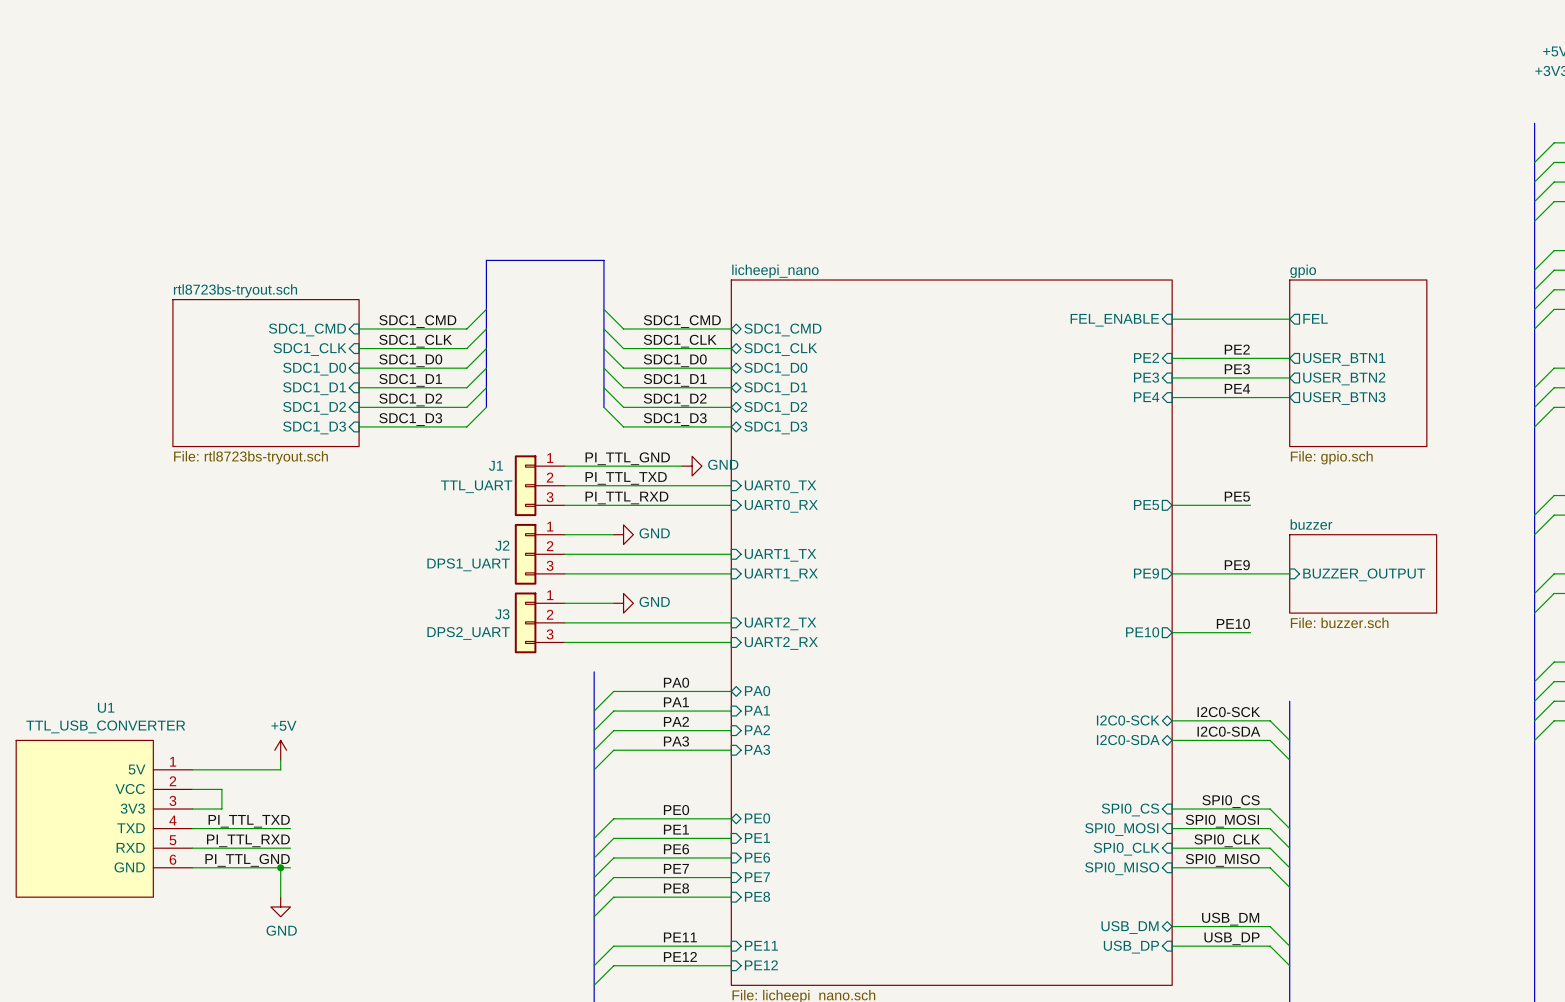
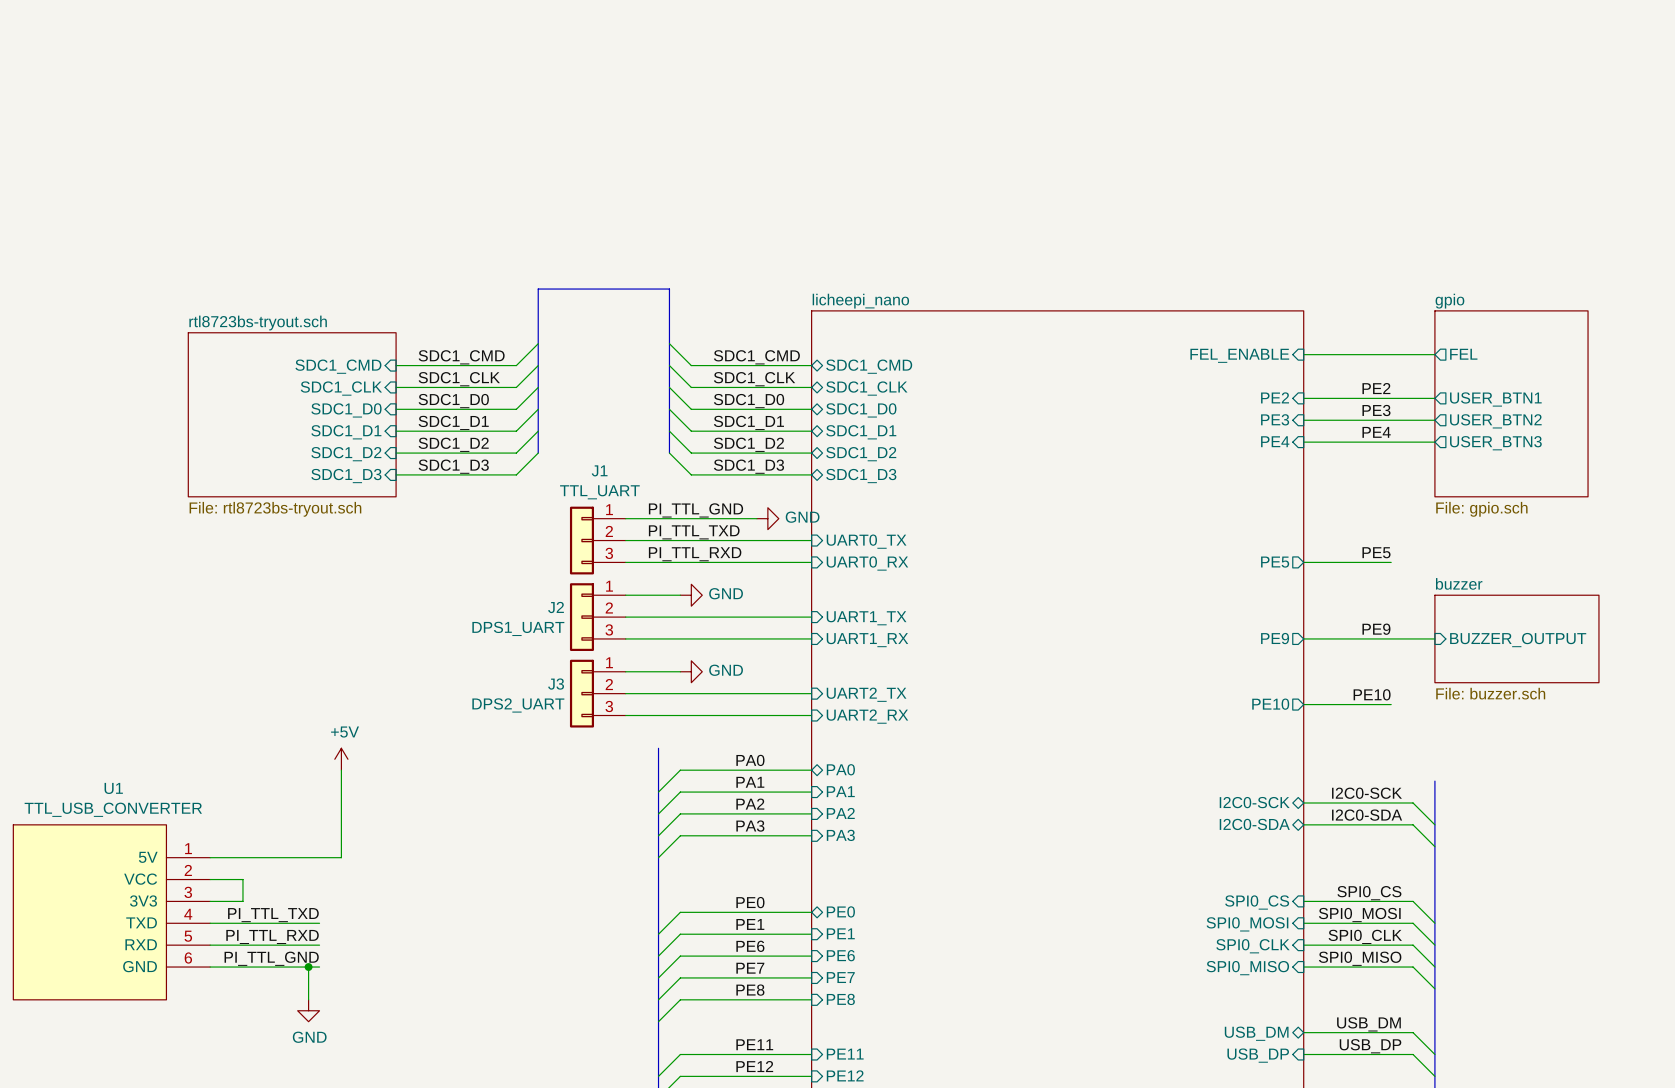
J1 name position: J1 (495, 465) -> J1 (599, 470)
J1 value position: TTL_UART (476, 486) -> TTL_UART (599, 492)
power symbol position: +5V (280, 750) -> +5V (341, 759)
wire: (280, 760) (280, 769) -> (341, 770) (341, 857) (308, 857)

